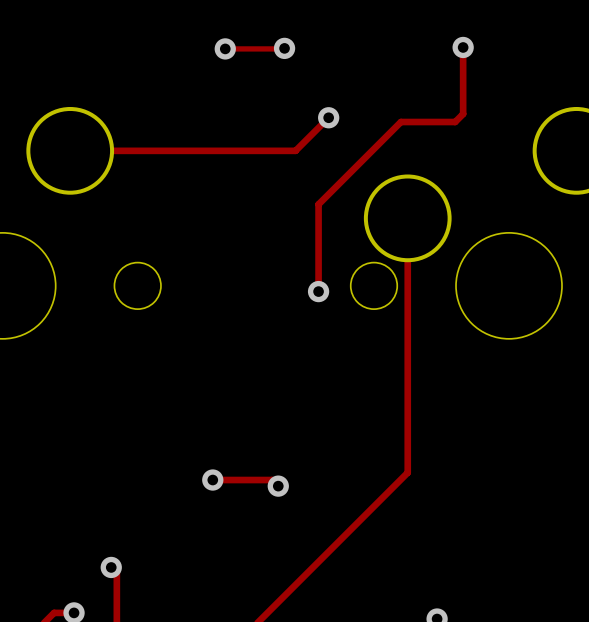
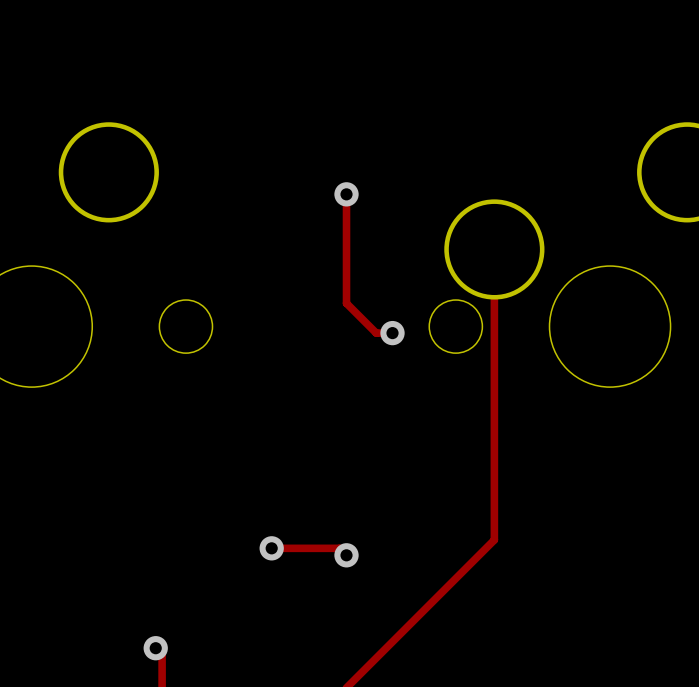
track: (463, 47) (463, 114) (455, 122) (400, 122) (318, 204) (318, 291) -> (346, 194) (346, 303) (376, 333) (392, 333)
via: (463, 47) -> none
via: (225, 48) -> none
track: (284, 48) (225, 48) -> none
via: (284, 48) -> none
track: (328, 117) (295, 150) (70, 150) -> none
via: (328, 117) -> none
via: none -> (346, 194)

